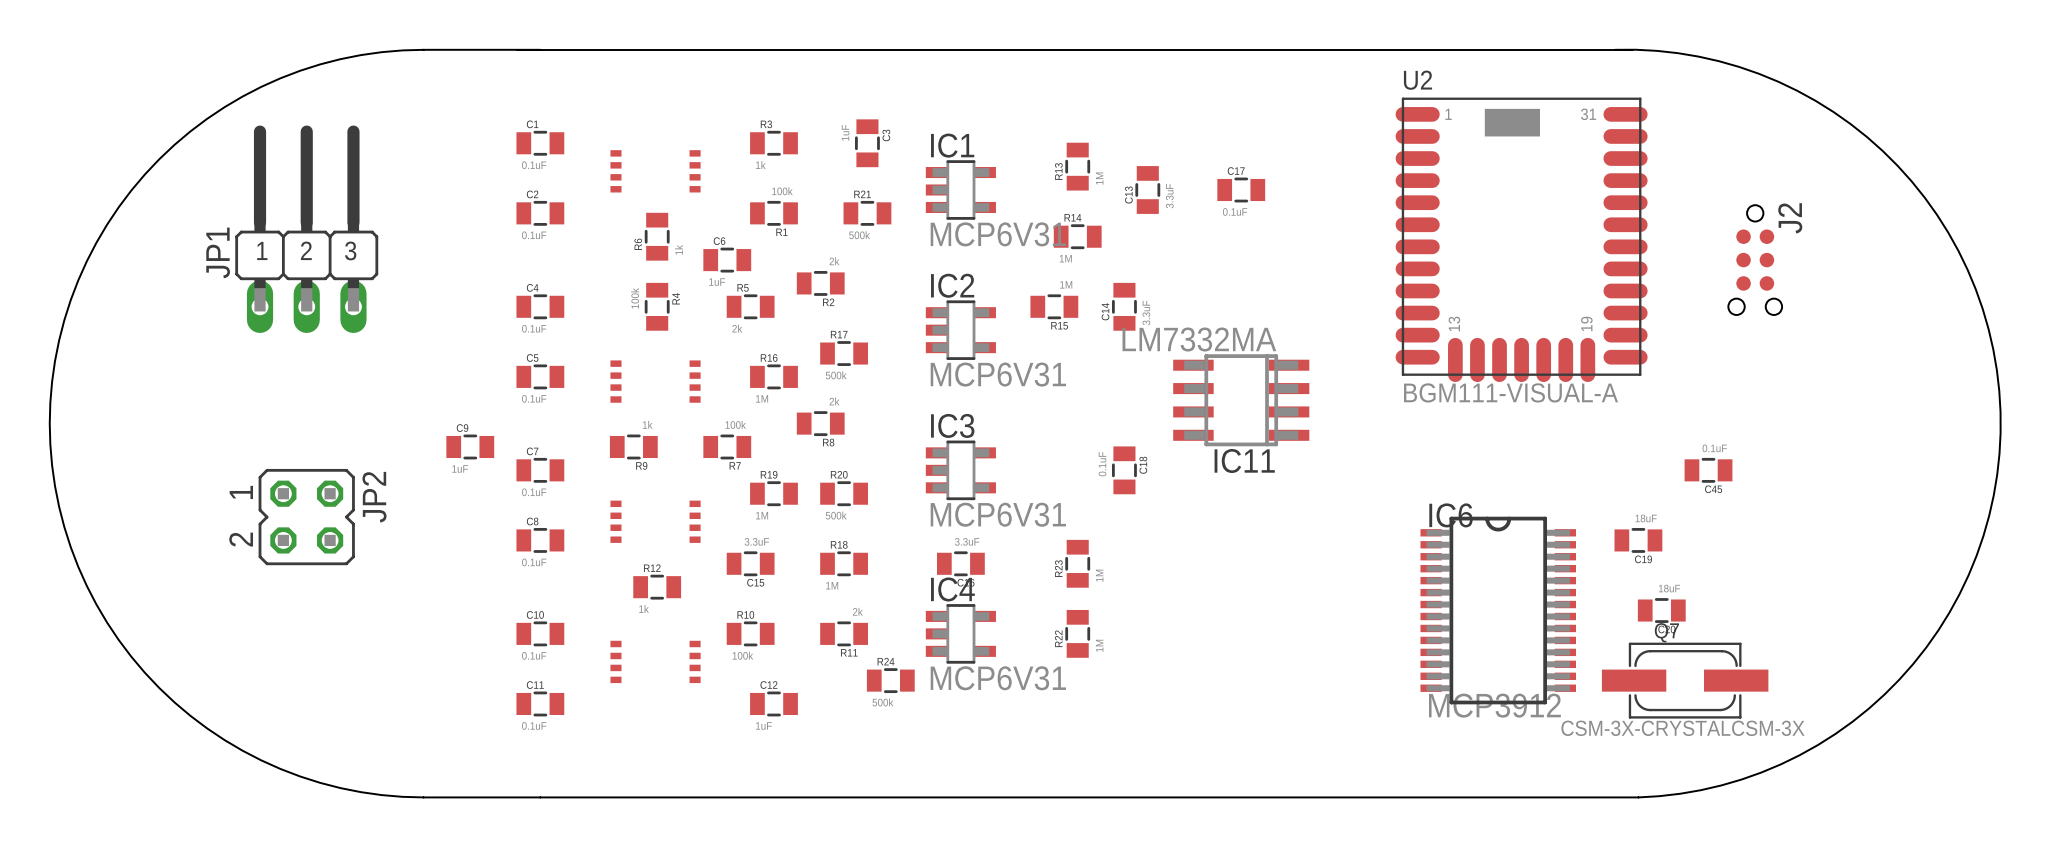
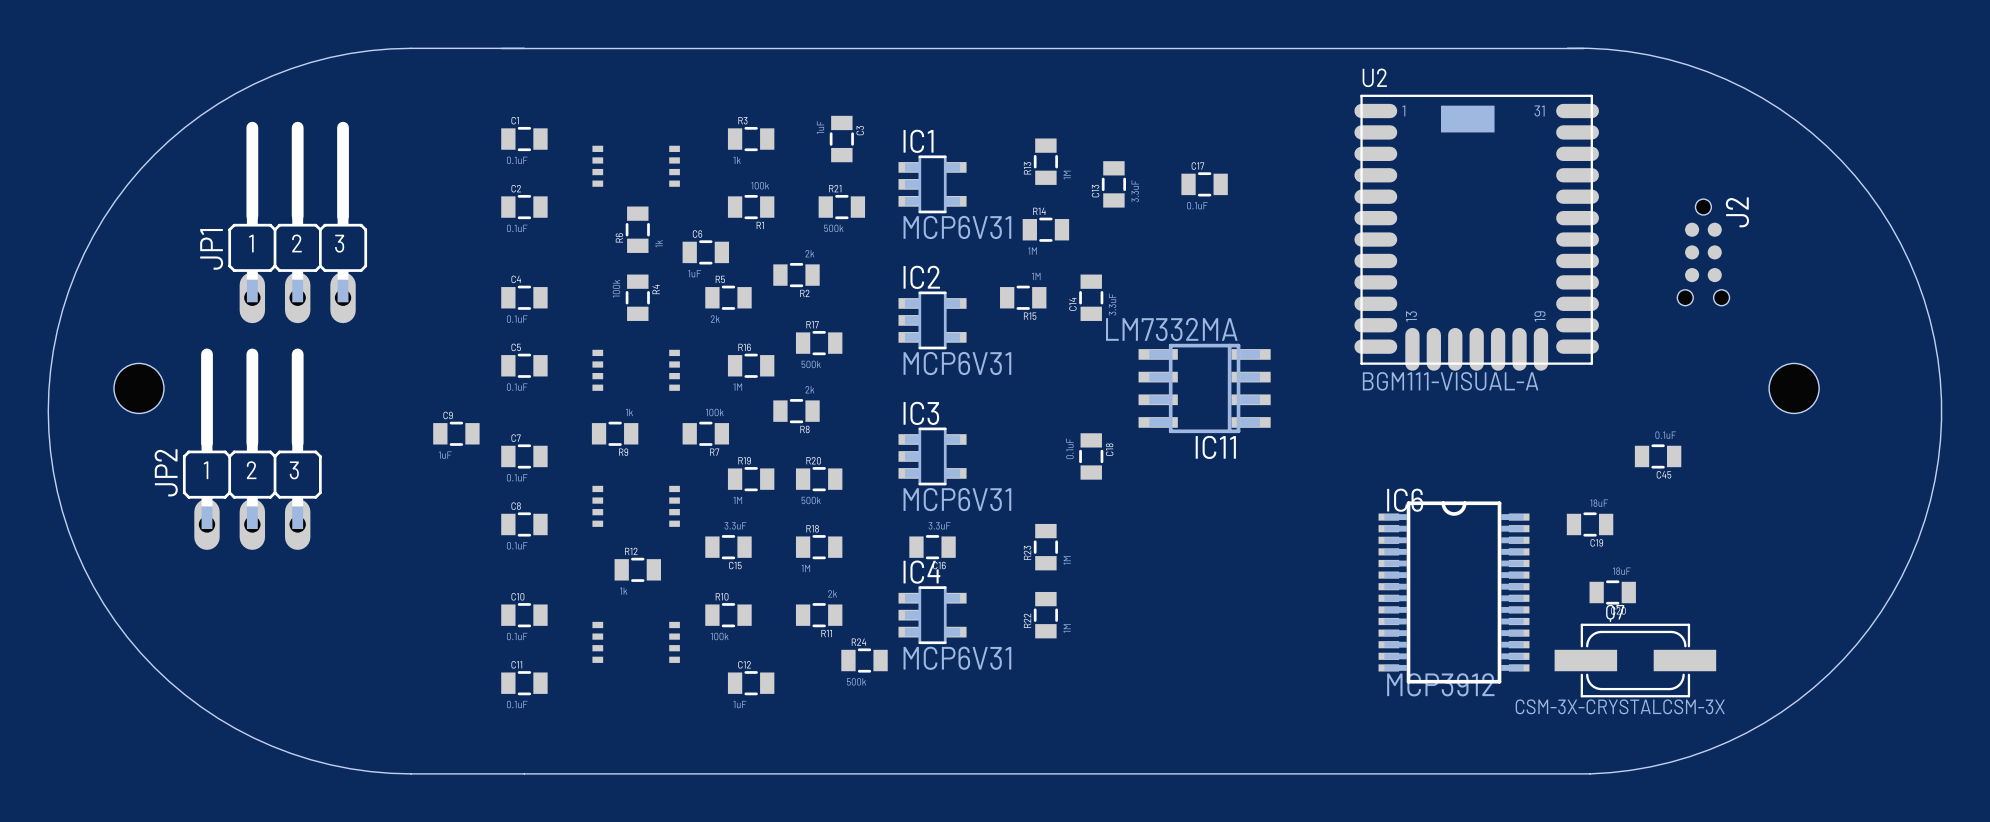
hole: none -> (138, 388)
hole: none -> (1794, 388)
JP2 footprint: [258, 468, 355, 566] -> [182, 348, 322, 550]
JP2 name position: JP2 (374, 497) -> JP2 (166, 472)

